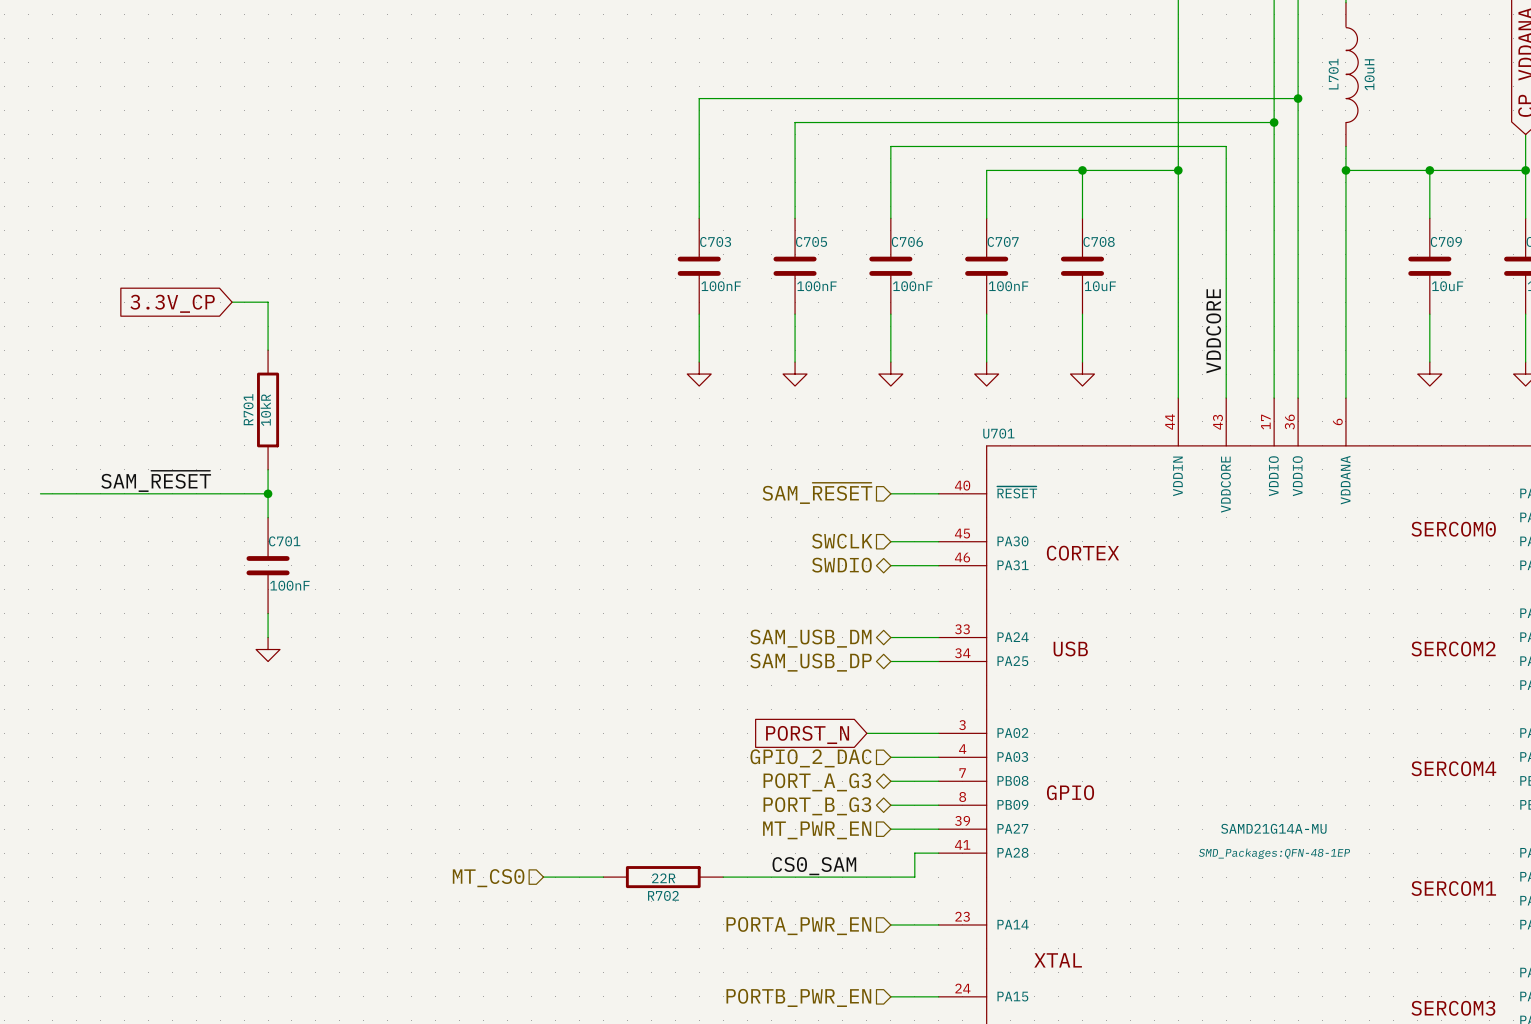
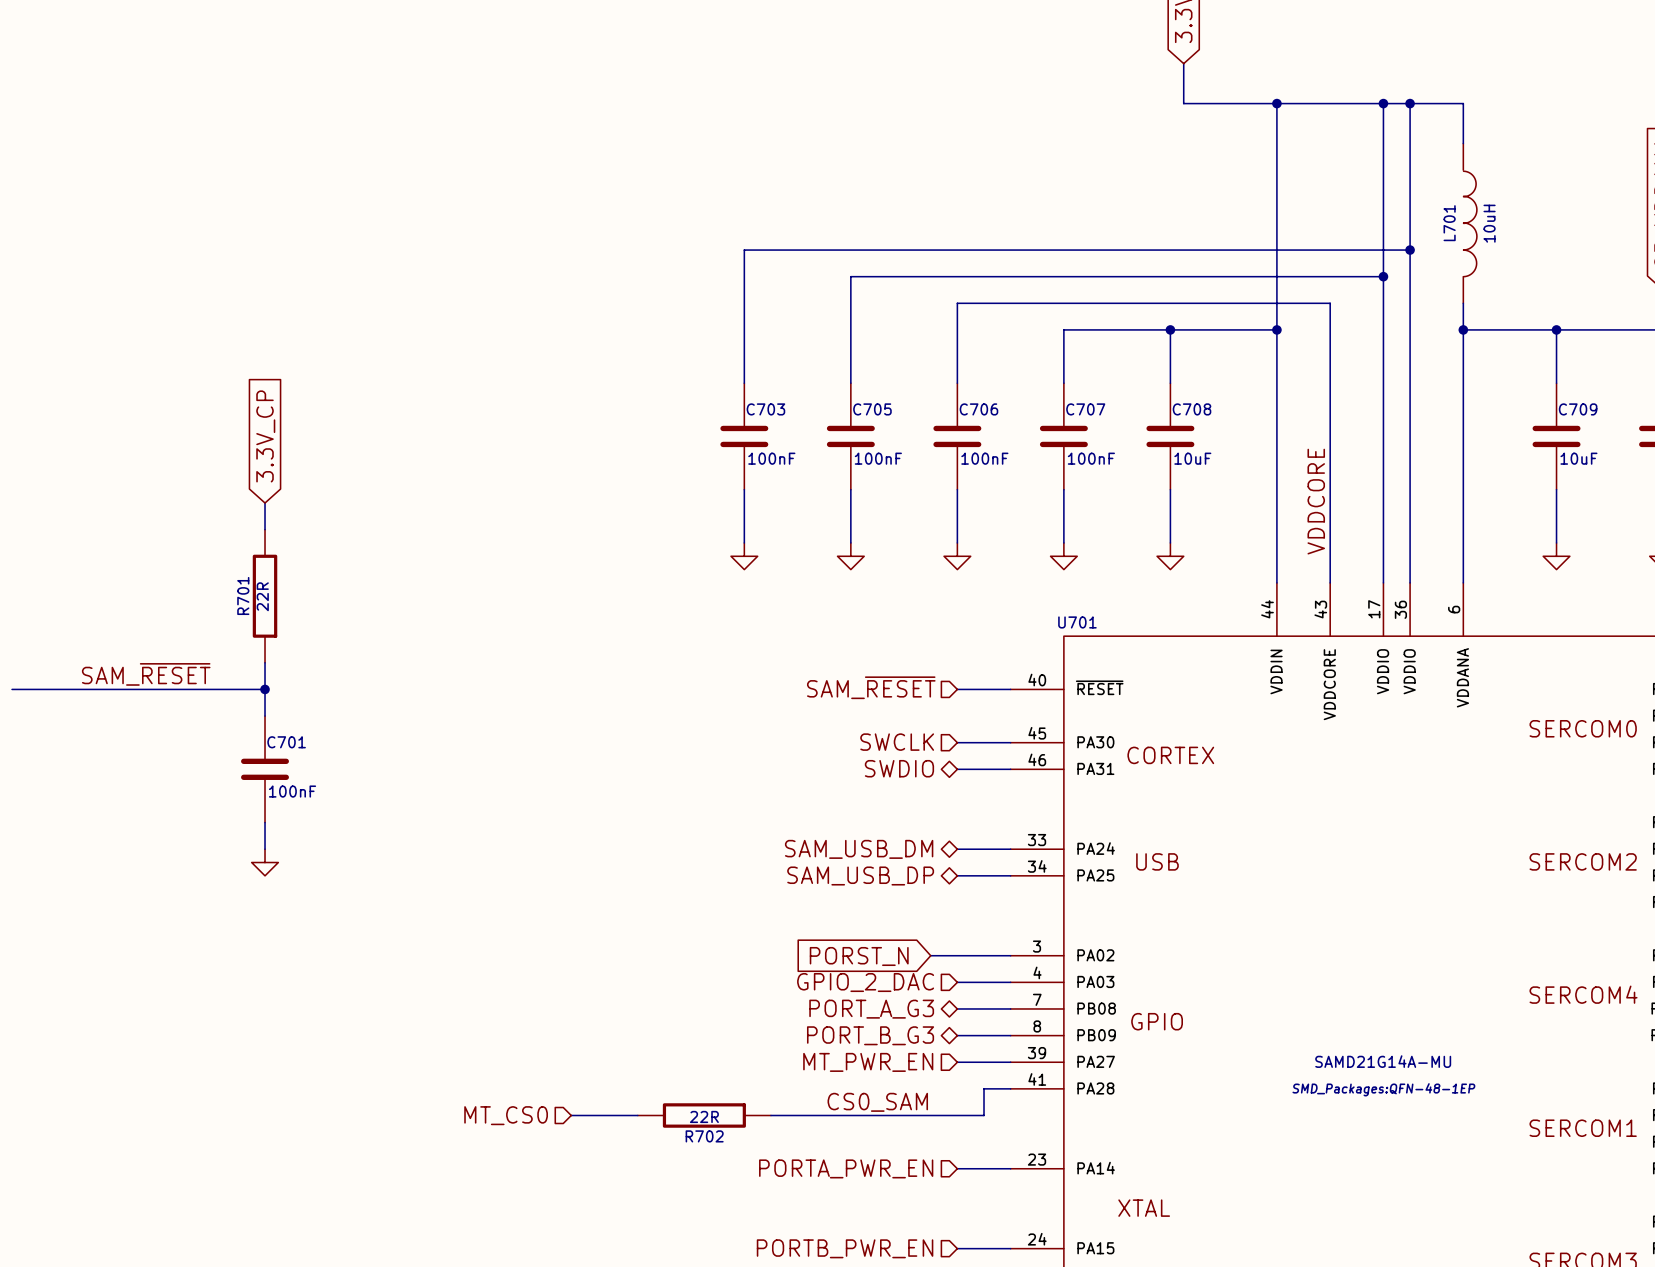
wire: (232, 302) (268, 302) (268, 326) -> none
global label rotation: 0° (172, 303) -> 90° clockwise (265, 436)
R701 value: 10kR (265, 410) -> 22R (262, 596)

